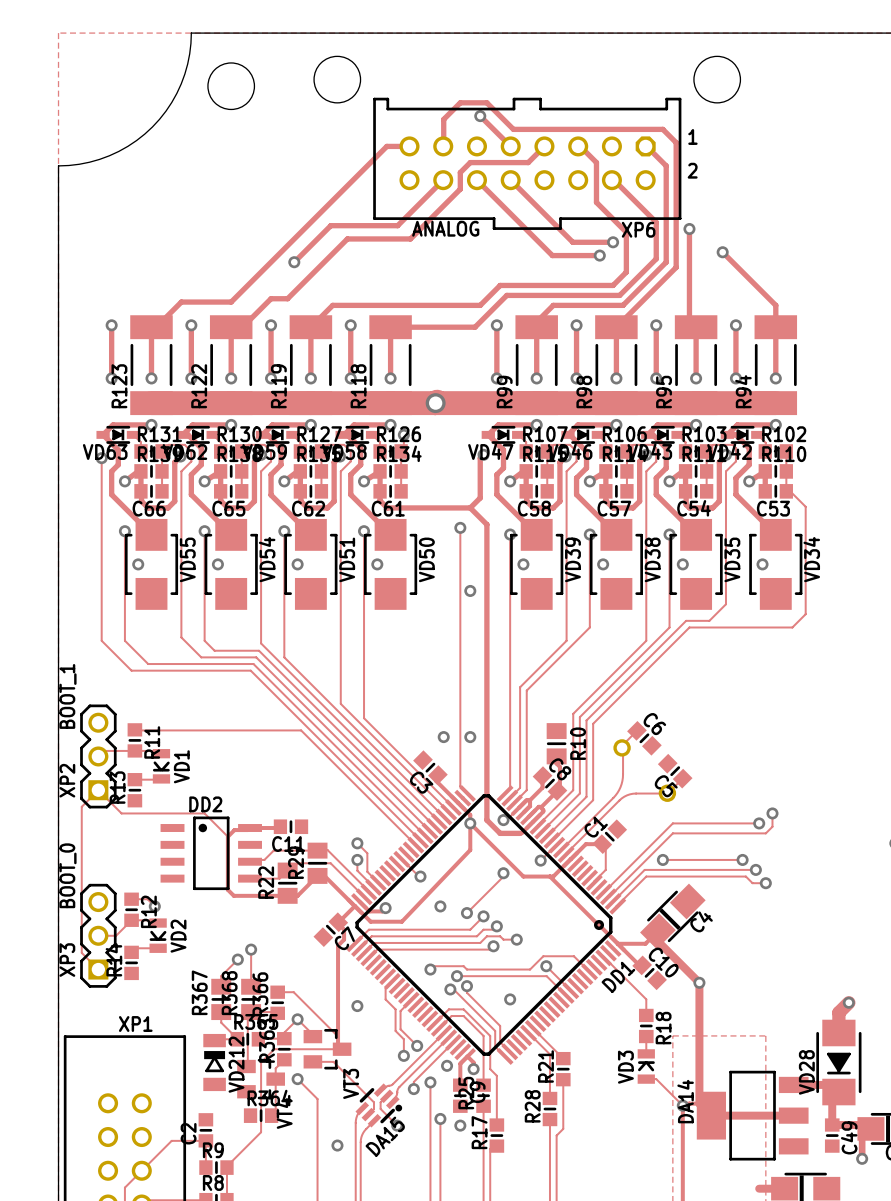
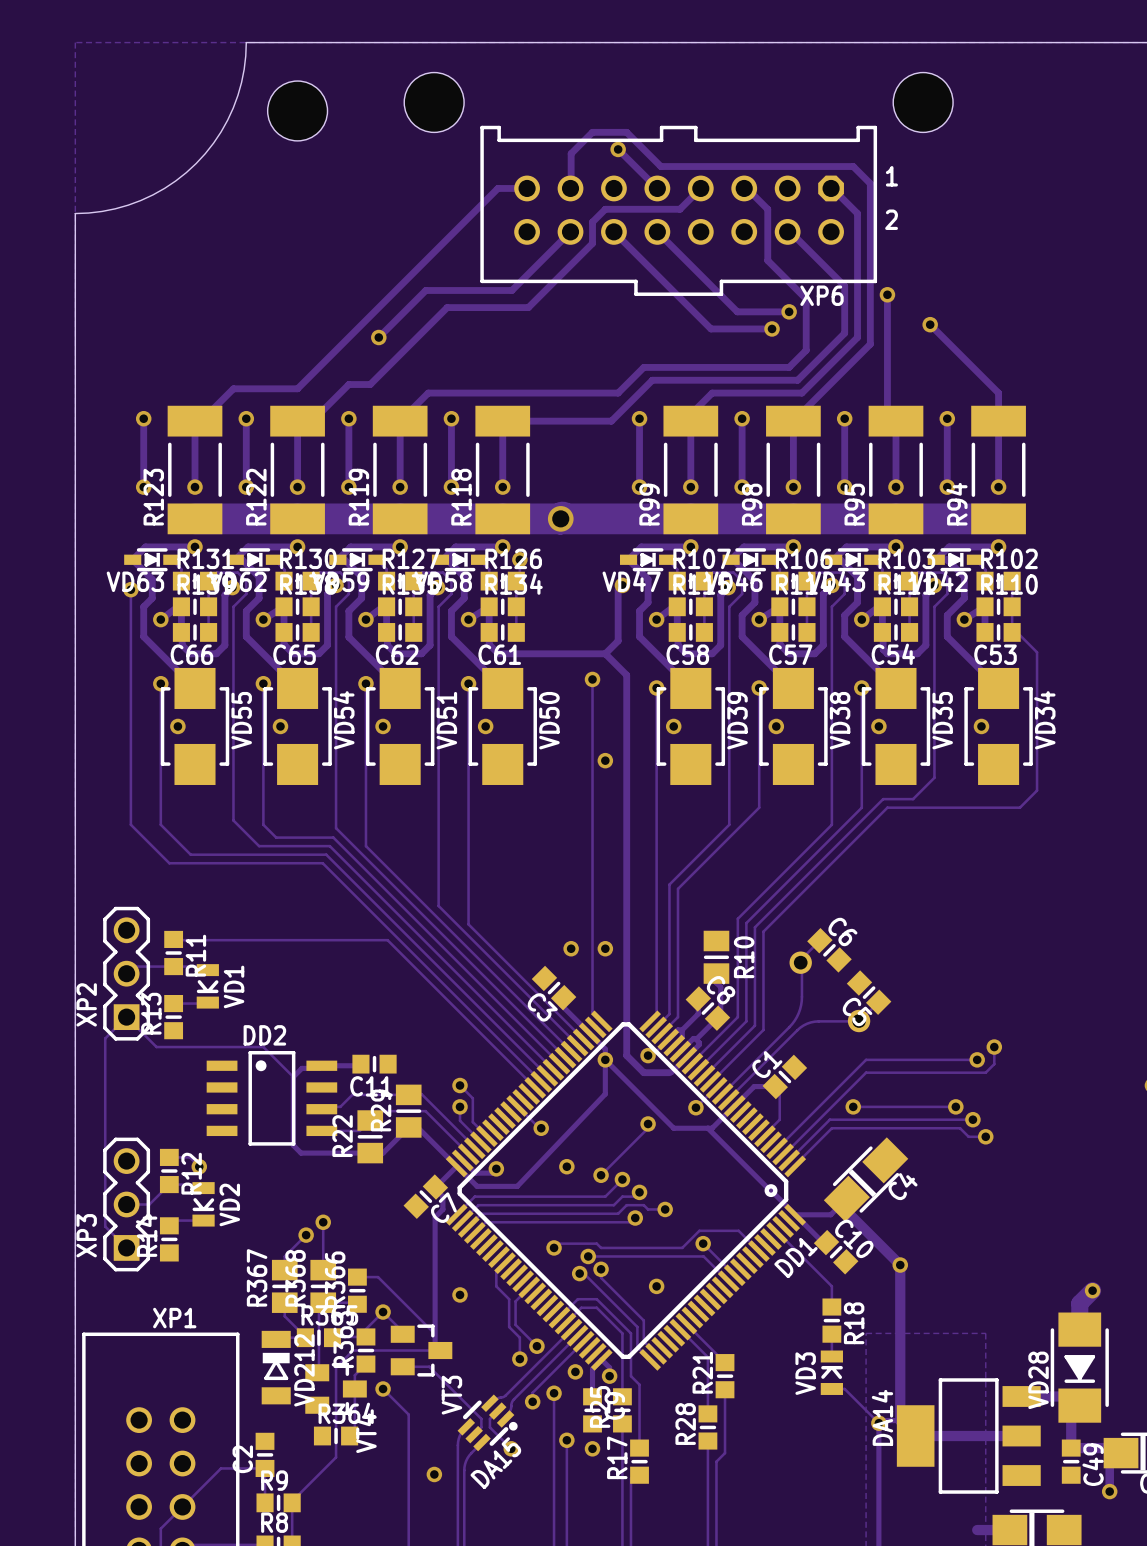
XP6 text: ANALOG (445, 228) -> none
XP2 text: BOOT_1 (67, 696) -> none
XP3 text: BOOT_0 (67, 875) -> none

